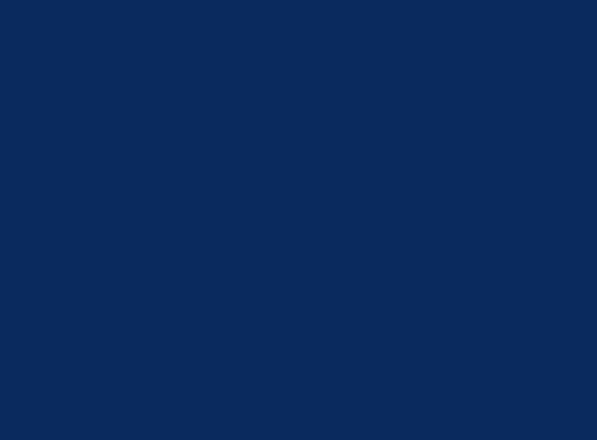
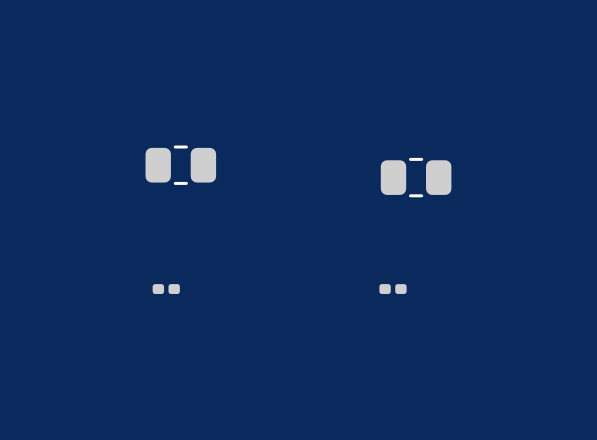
part: none -> (180, 165)
part: none -> (416, 177)
part: none -> (166, 289)
part: none -> (393, 289)

